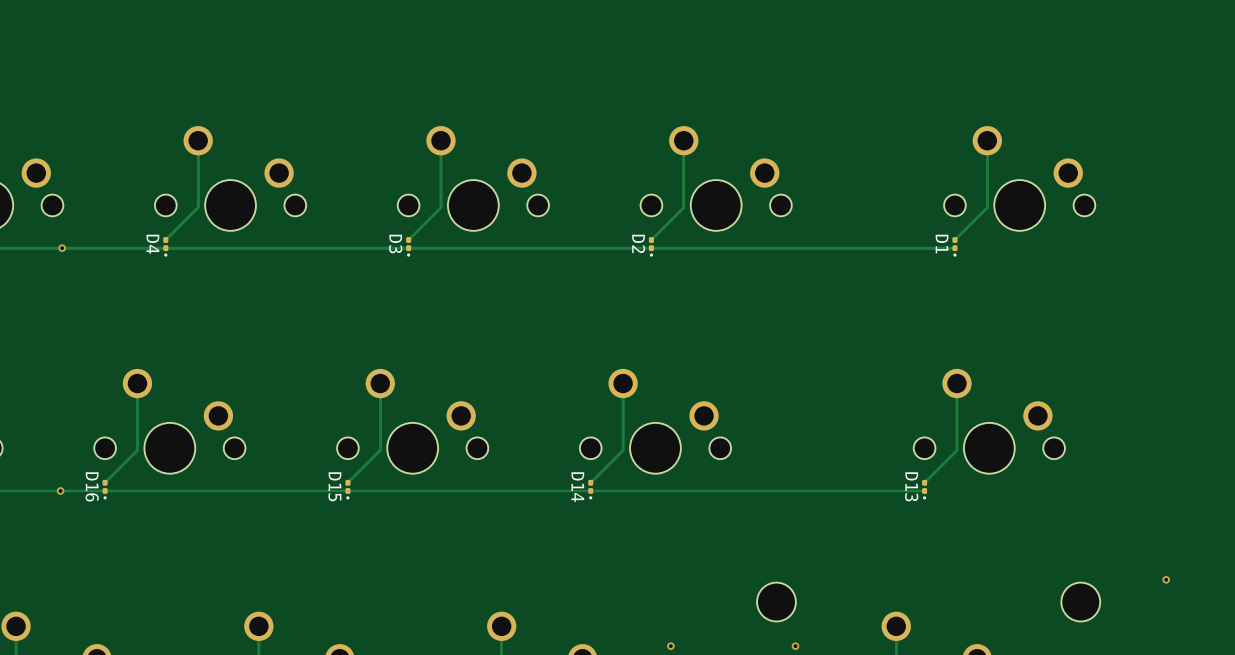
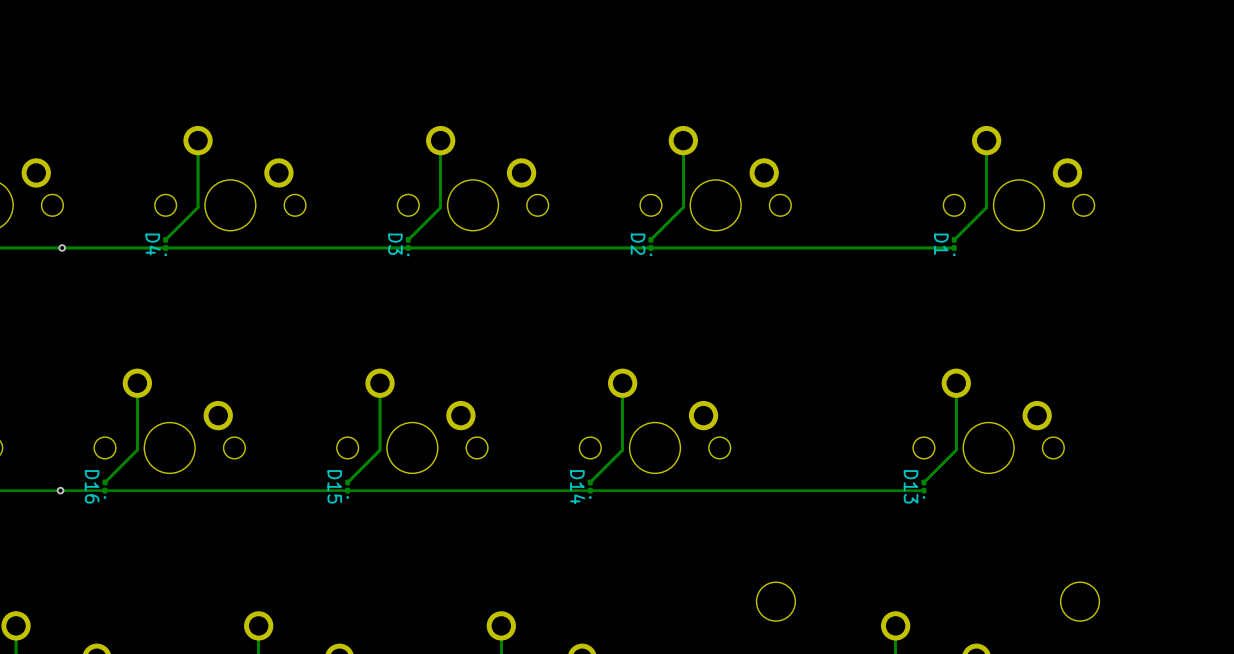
via: (1166, 579) -> none
via: (670, 646) -> none
via: (795, 646) -> none

